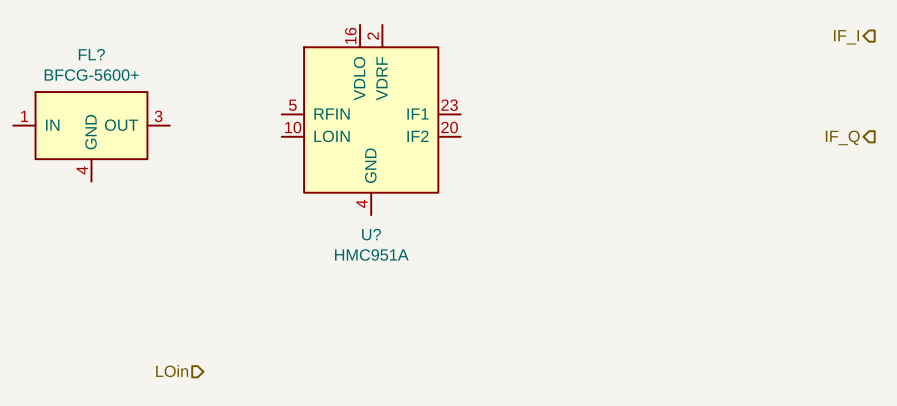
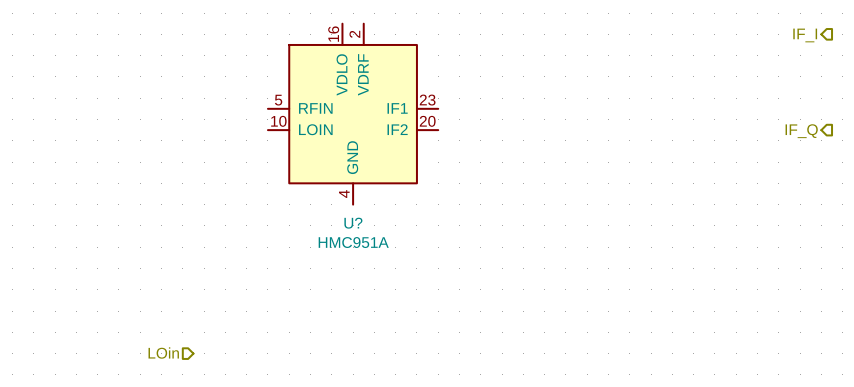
FL?: BFCG-5600+ (91, 136) -> none

